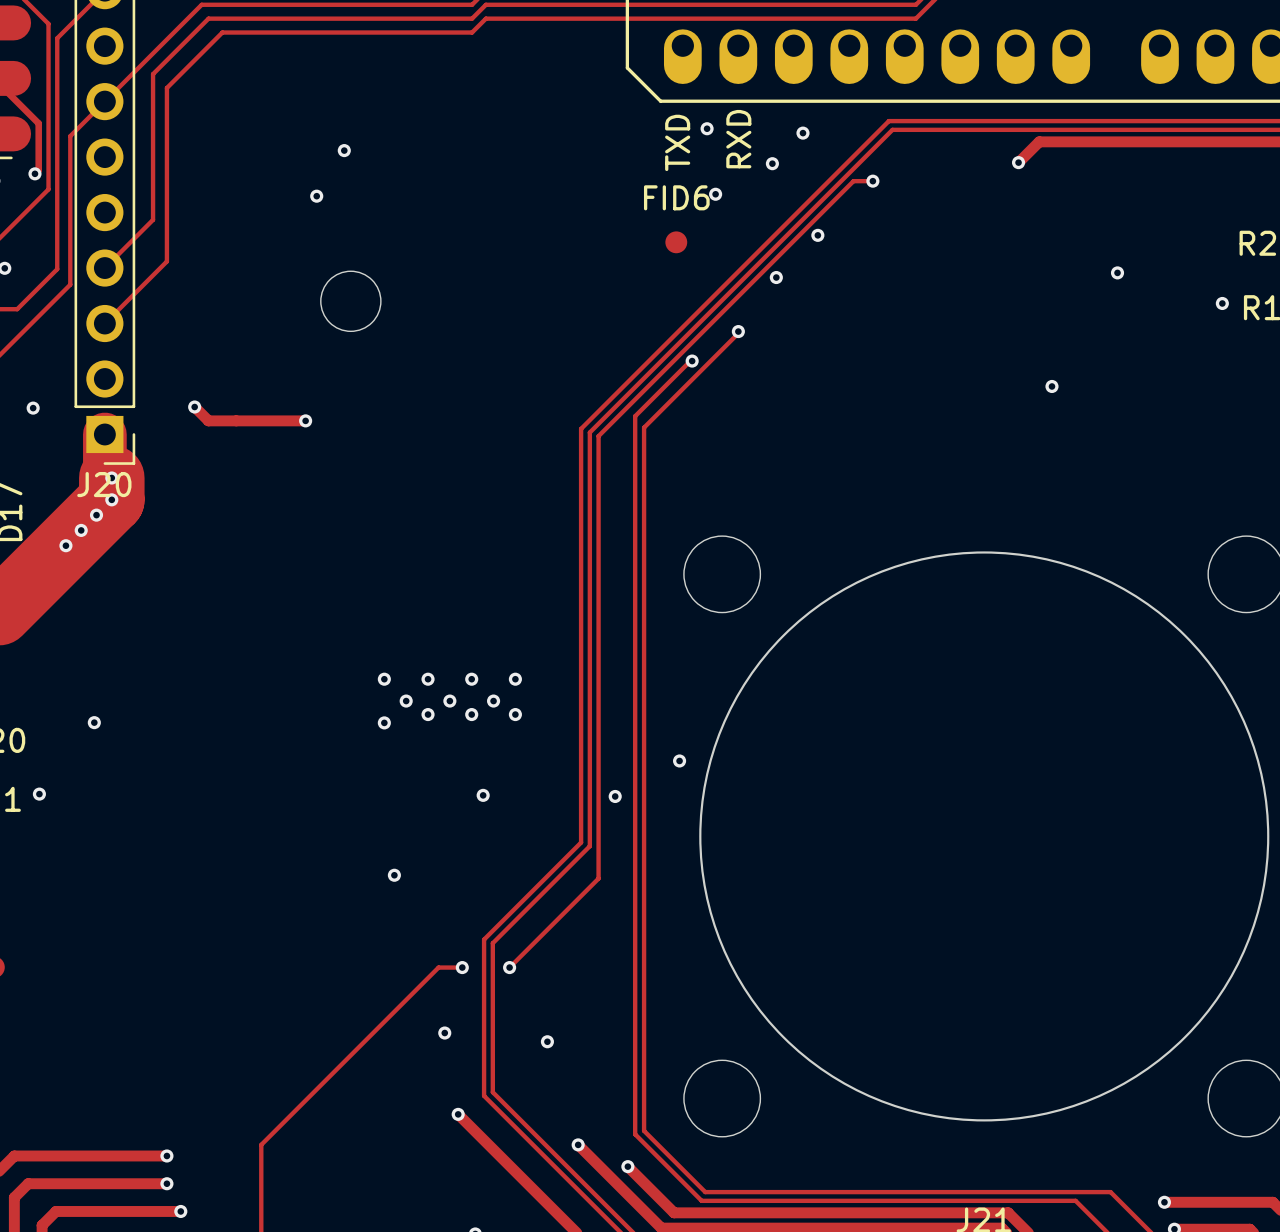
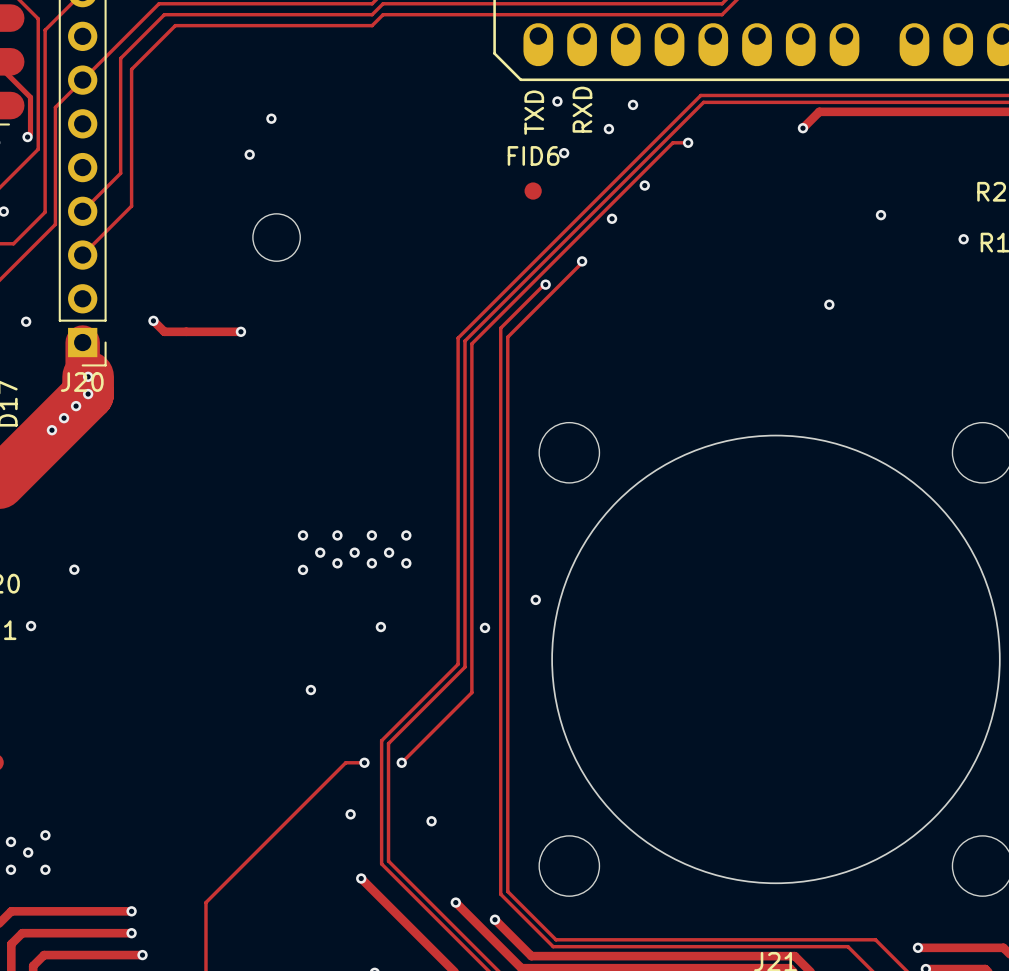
via: none -> (45, 835)
via: none -> (10, 841)
via: none -> (28, 852)
via: none -> (10, 869)
via: none -> (45, 869)

